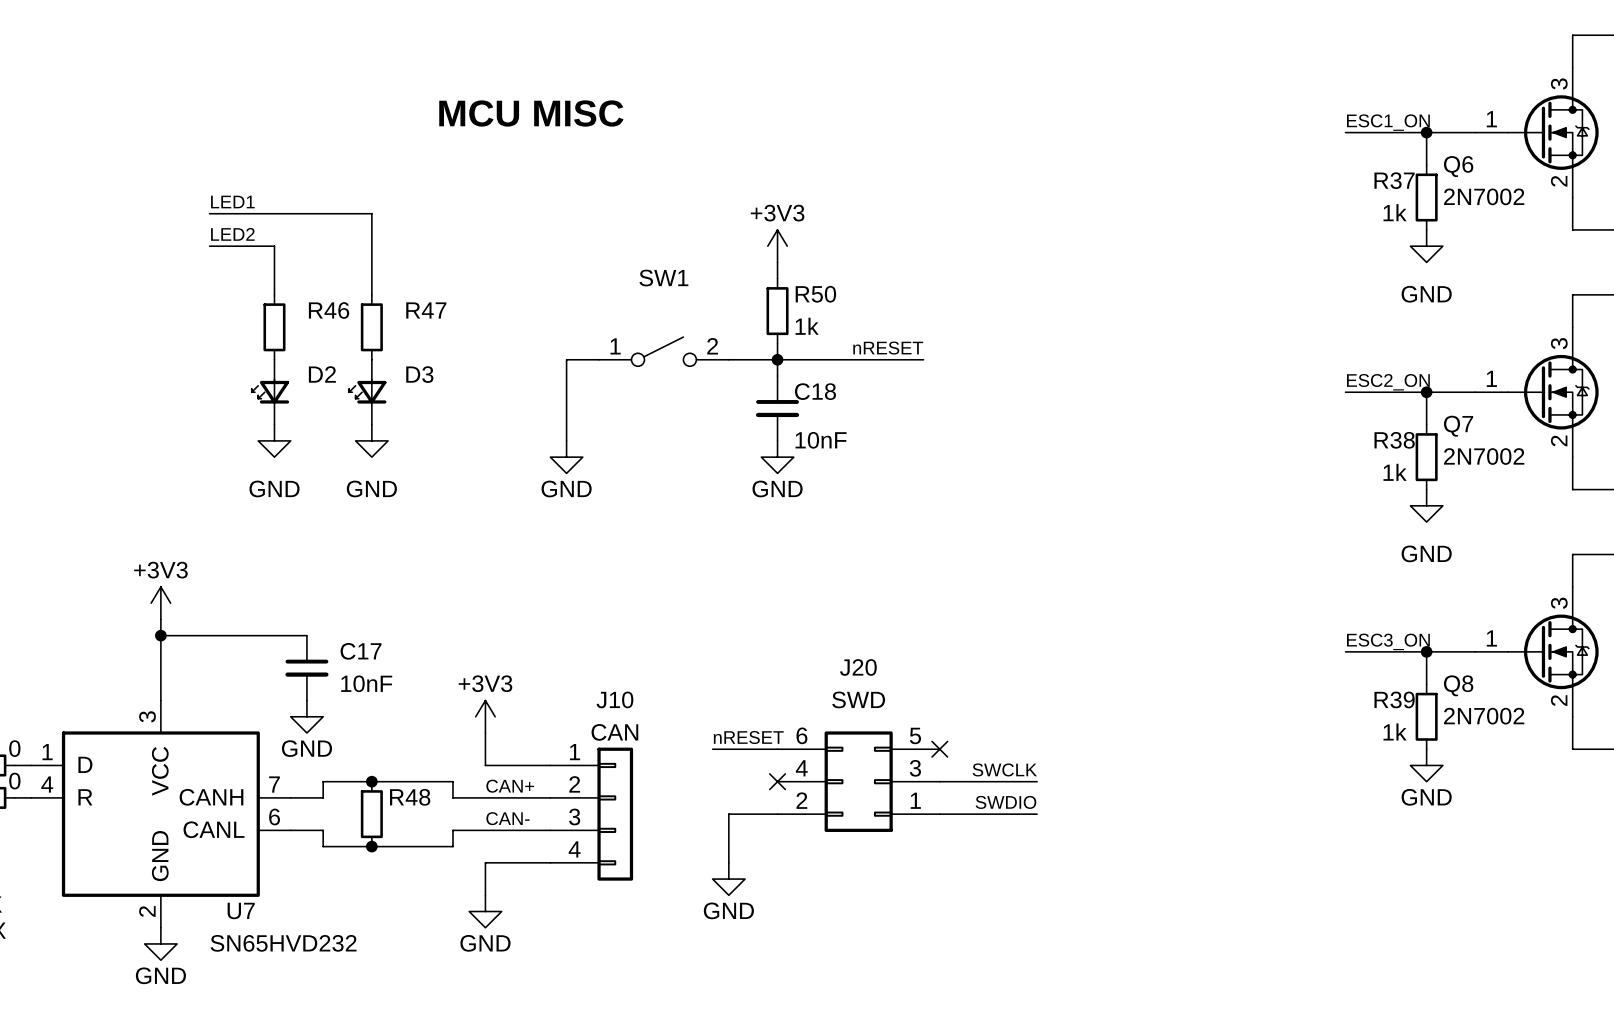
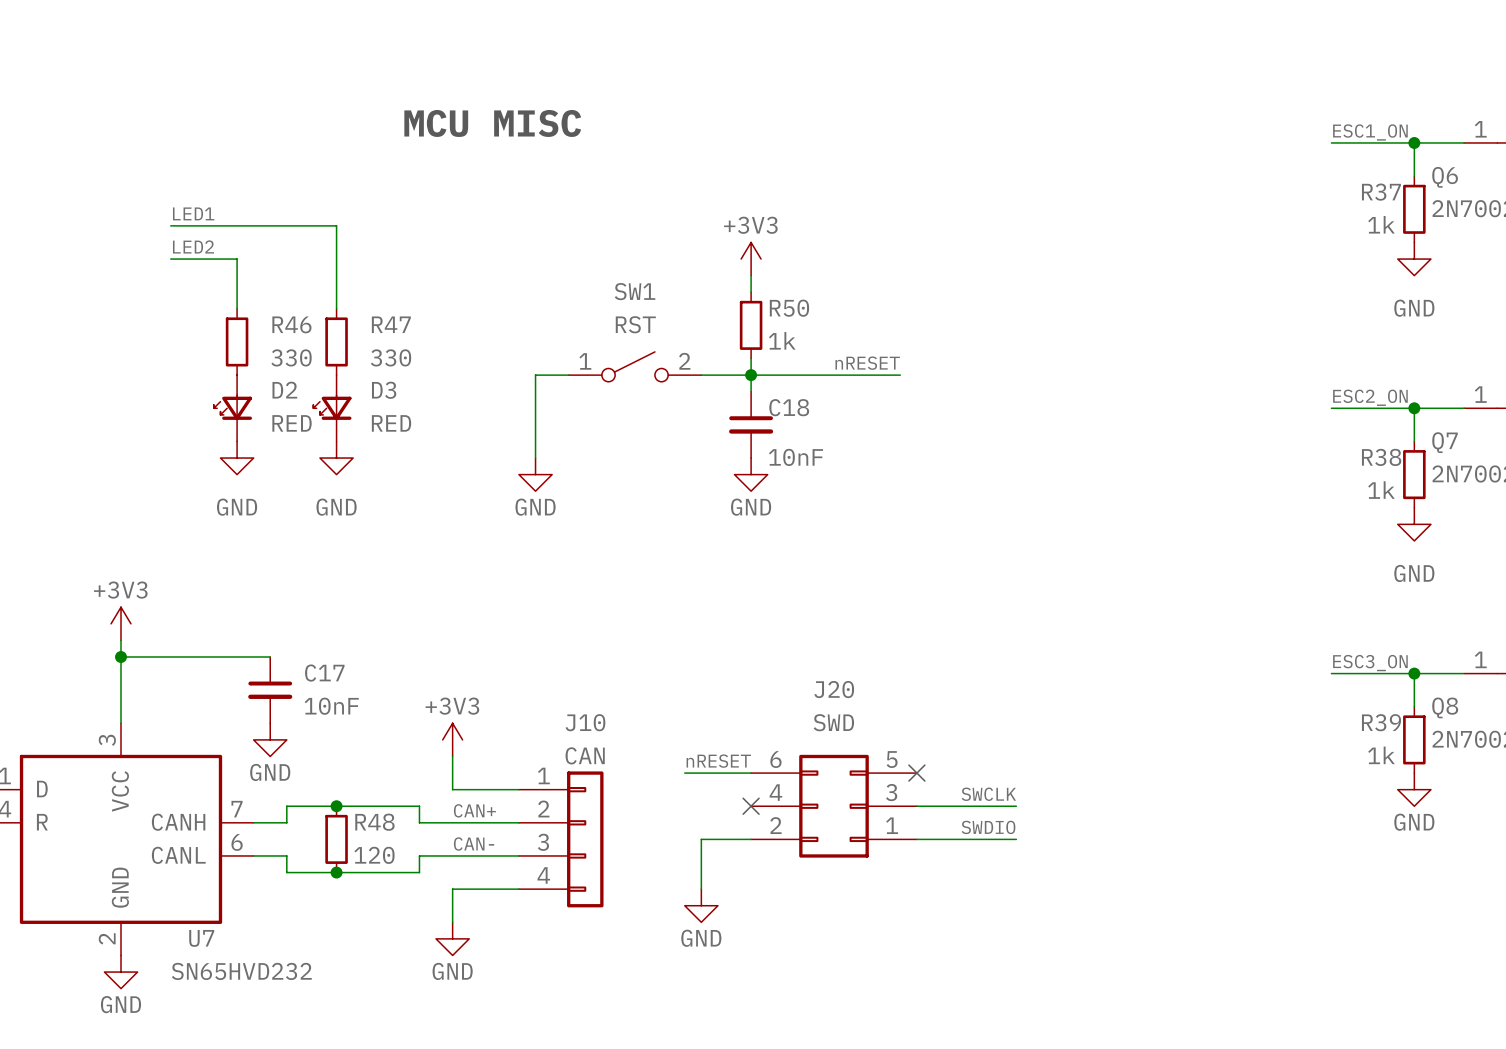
SW1 value: none -> RST (635, 324)
R46 value: none -> 330 (291, 357)
R47 value: none -> 330 (391, 357)
D2 value: none -> RED (292, 423)
D3 value: none -> RED (391, 423)
R48 value: none -> 120 (374, 855)

